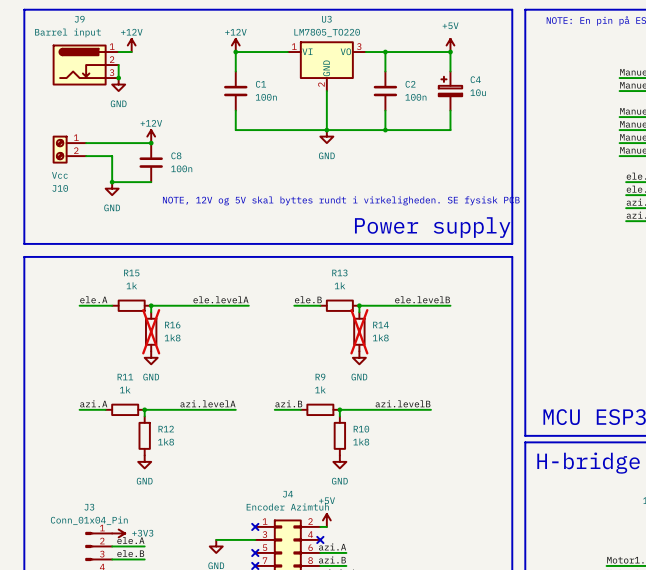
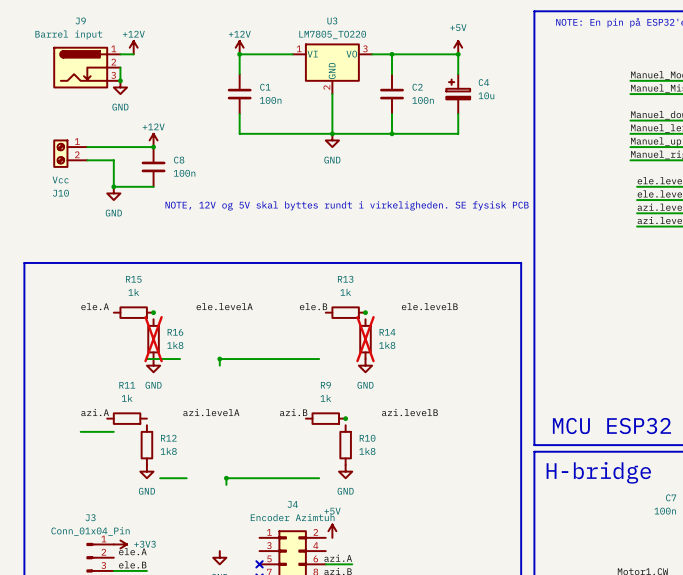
line: (24, 9) (512, 9) (512, 243) (24, 243) (24, 9) -> none
text: Power supply (432, 227) -> none
wire: (79, 305) (112, 305) -> (146, 359) (180, 359)
wire: (248, 305) (151, 305) (151, 312) -> (319, 359) (219, 359) (219, 365)
wire: (294, 305) (320, 305) -> none
wire: (450, 305) (359, 305) (359, 312) -> none
junction: none -> (219, 359)
wire: (79, 409) (105, 409) -> (160, 478) (186, 478)
junction: (144, 409) -> none
wire: (235, 409) (144, 409) (144, 416) -> (319, 478) (226, 478) (226, 484)
wire: (274, 409) (300, 409) -> none
wire: (430, 409) (339, 409) (339, 416) -> none
junction: none -> (226, 478)
no-connect mark: (255, 526) -> none
wire: (320, 526) (326, 526) -> none
wire: (216, 539) (255, 539) -> none
no-connect mark: (320, 539) -> none
wire: (112, 546) (144, 546) -> (80, 431) (113, 431)

